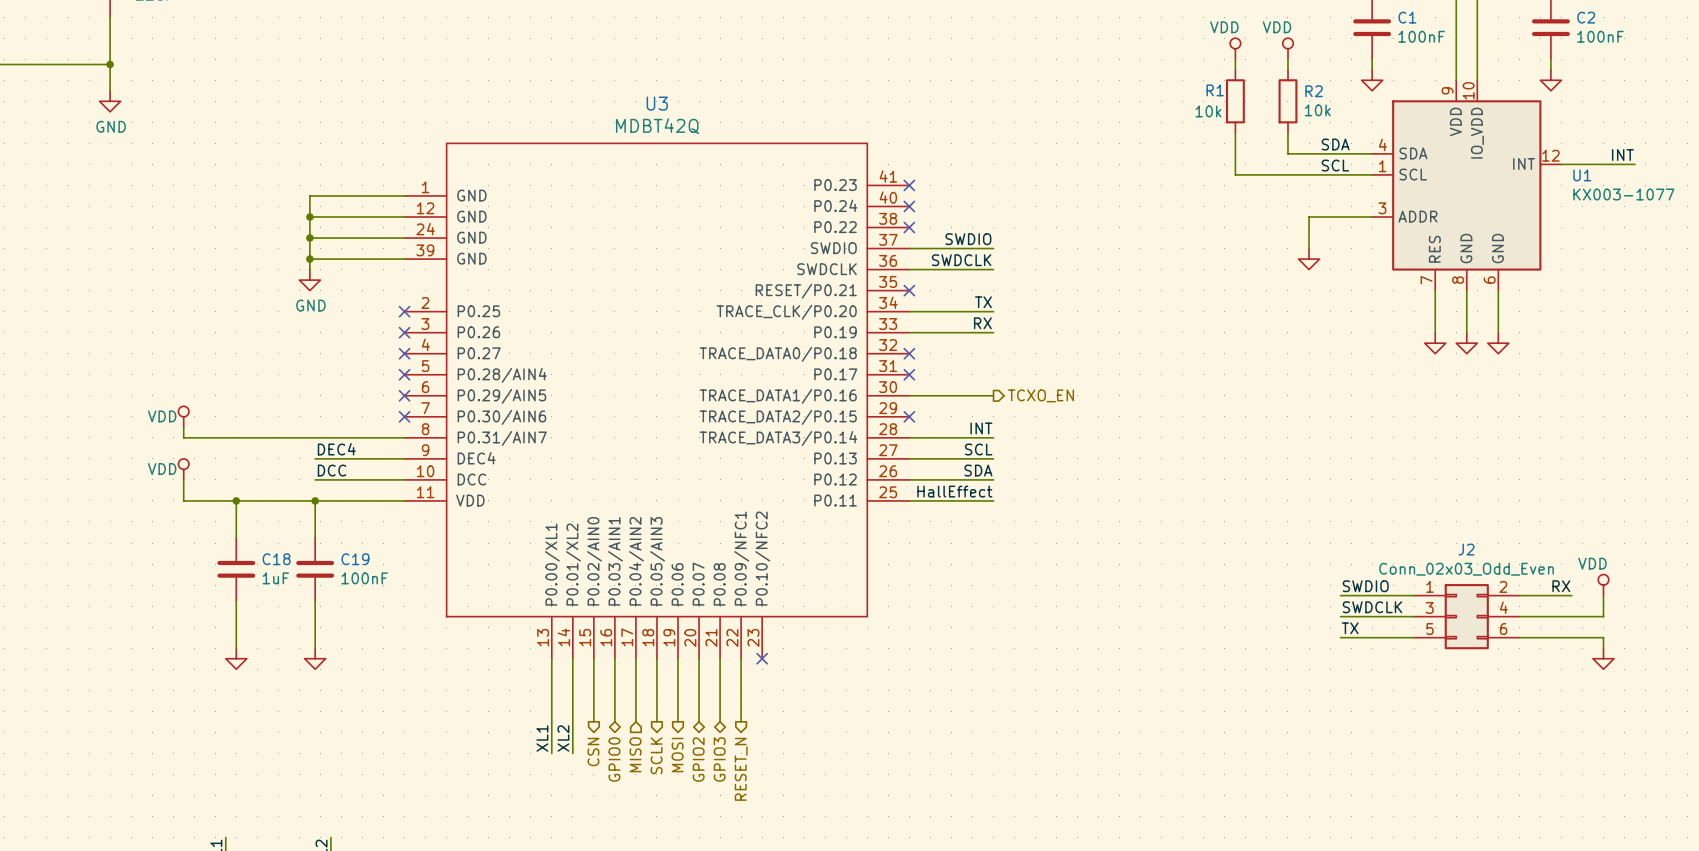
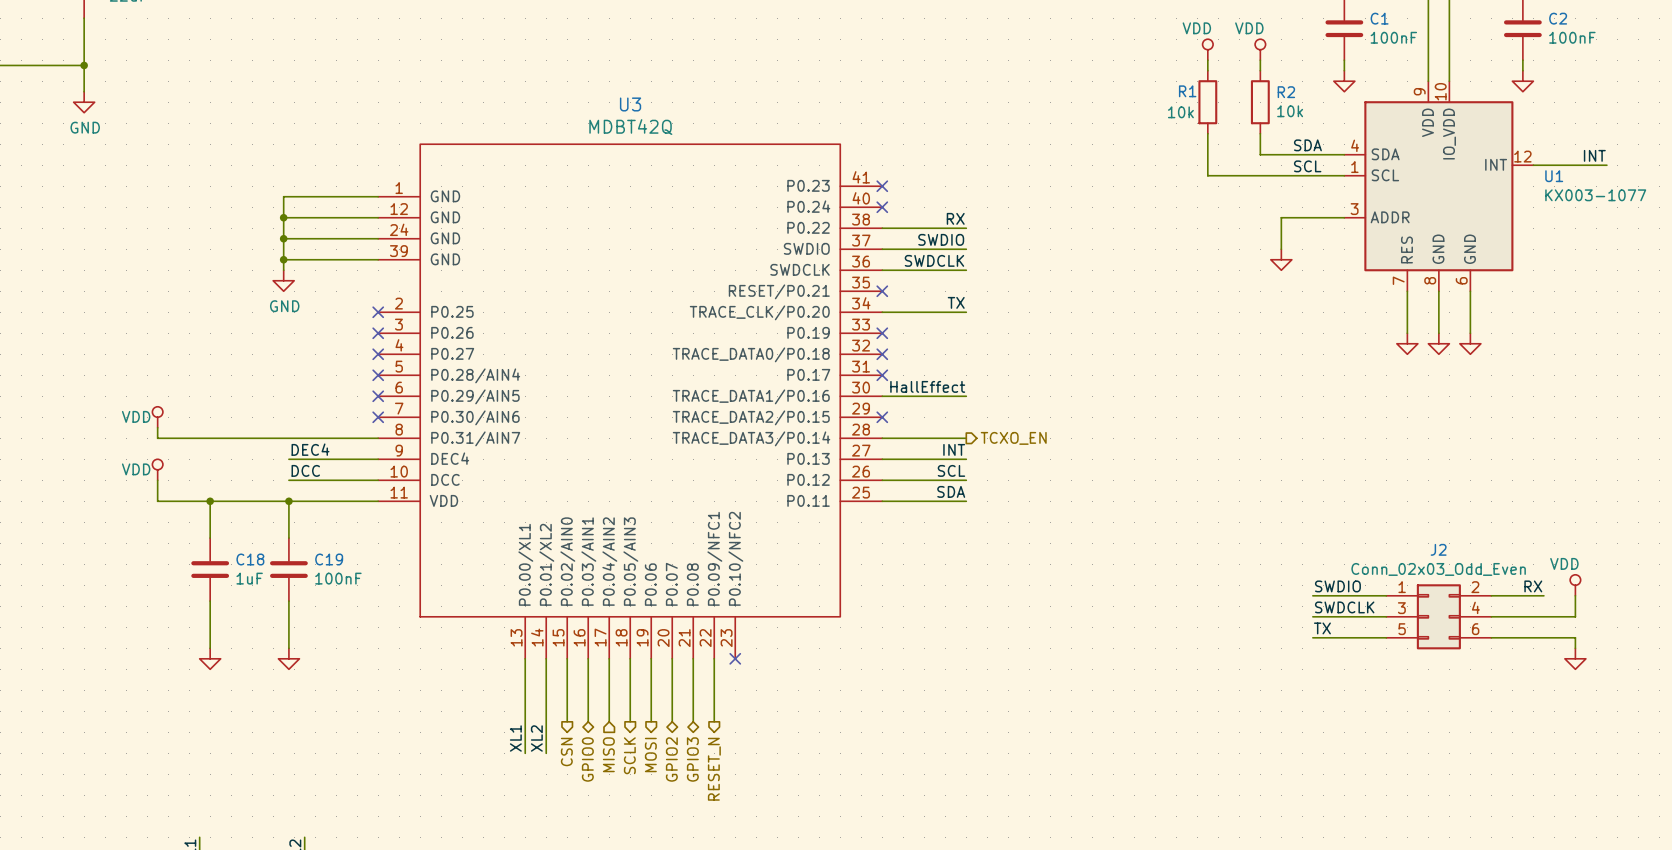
no-connect mark: (909, 227) -> none
label position: RX (982, 323) -> RX (955, 218)
wire: (909, 332) (993, 332) -> (882, 228) (966, 228)
no-connect mark: none -> (882, 333)
label: none -> HallEffect (927, 386)
hierarchical label position: TCXO_EN (1041, 395) -> TCXO_EN (1013, 438)
label: INT (981, 428) -> none
label: SCL (978, 449) -> INT (954, 449)
label: SDA (978, 470) -> SCL (951, 470)
label: HallEffect (954, 491) -> SDA (951, 491)

